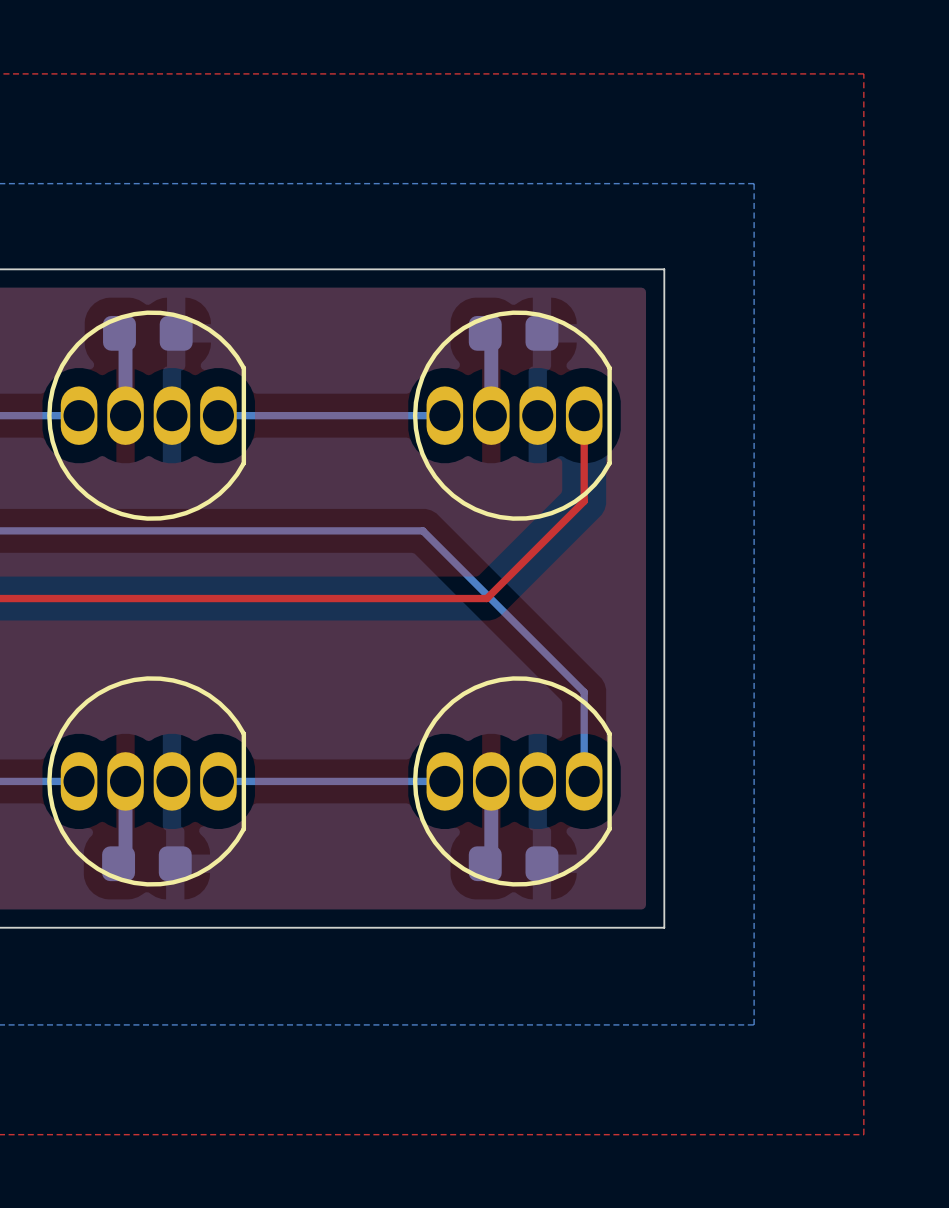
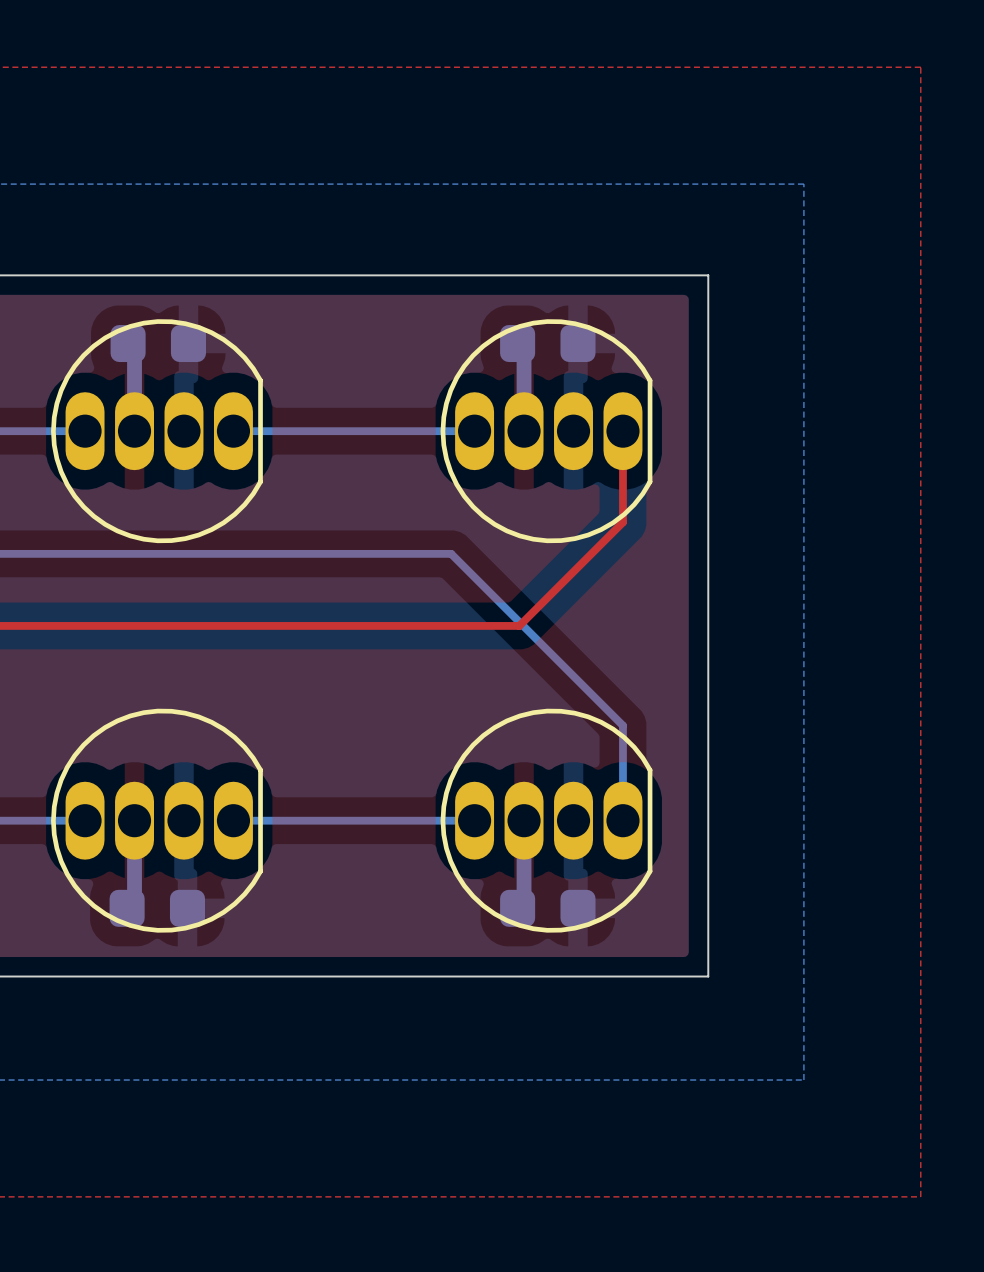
part footprint: [47, 310, 247, 521] -> [51, 319, 263, 544]
part footprint: [412, 310, 612, 521] -> [440, 319, 653, 544]
part footprint: [47, 676, 247, 887] -> [51, 708, 263, 933]
part footprint: [412, 676, 612, 887] -> [440, 708, 653, 933]

